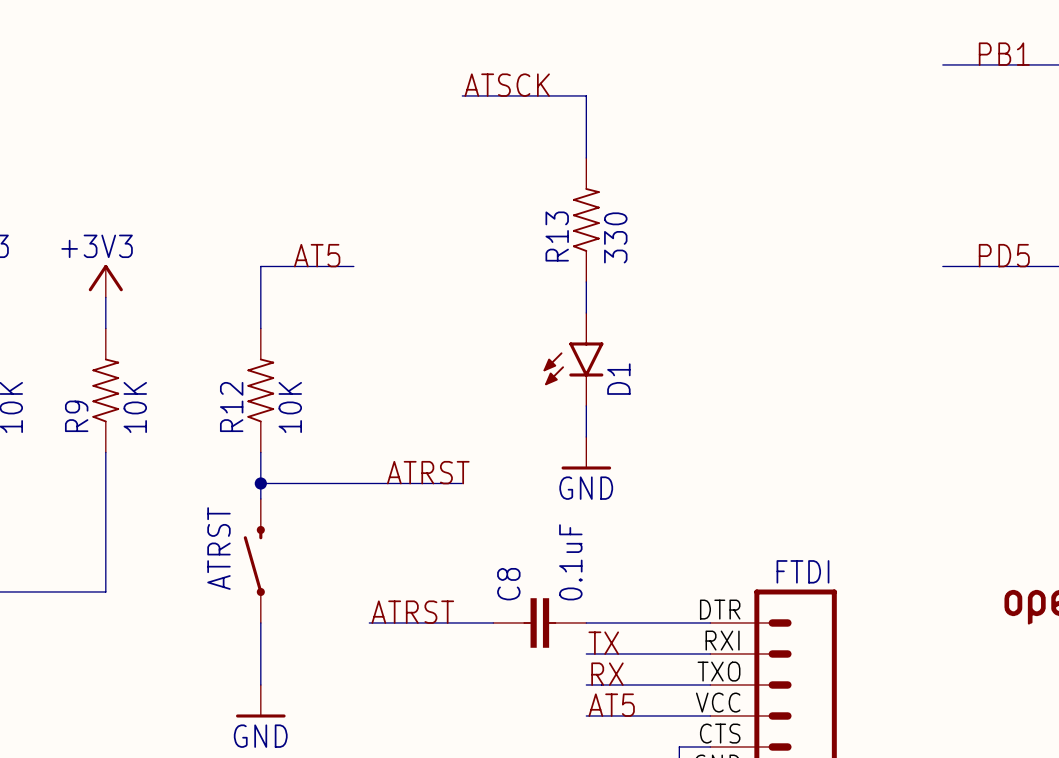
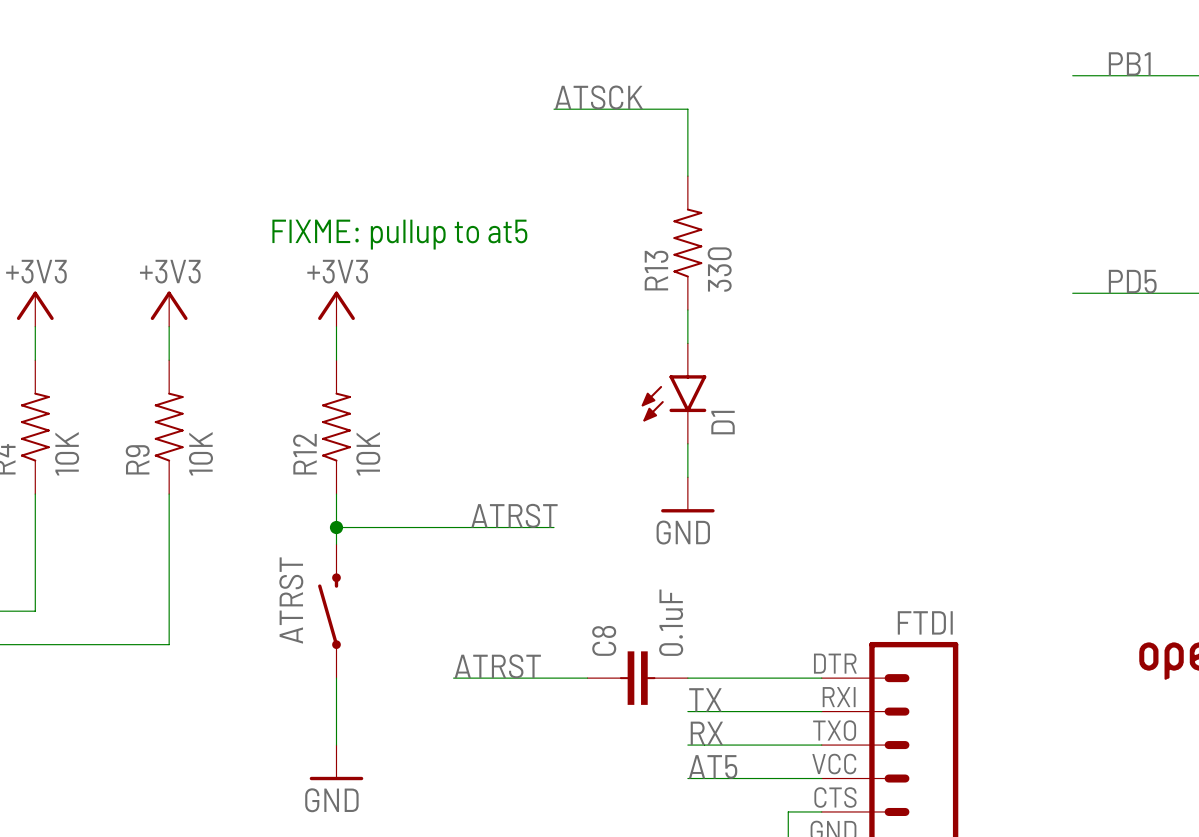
text: none -> FIXME: pullup to at5 (399, 234)
label: AT5 (317, 255) -> none
wire: (353, 266) (260, 266) (260, 297) -> none
power symbol: none -> +3V3 (336, 309)

